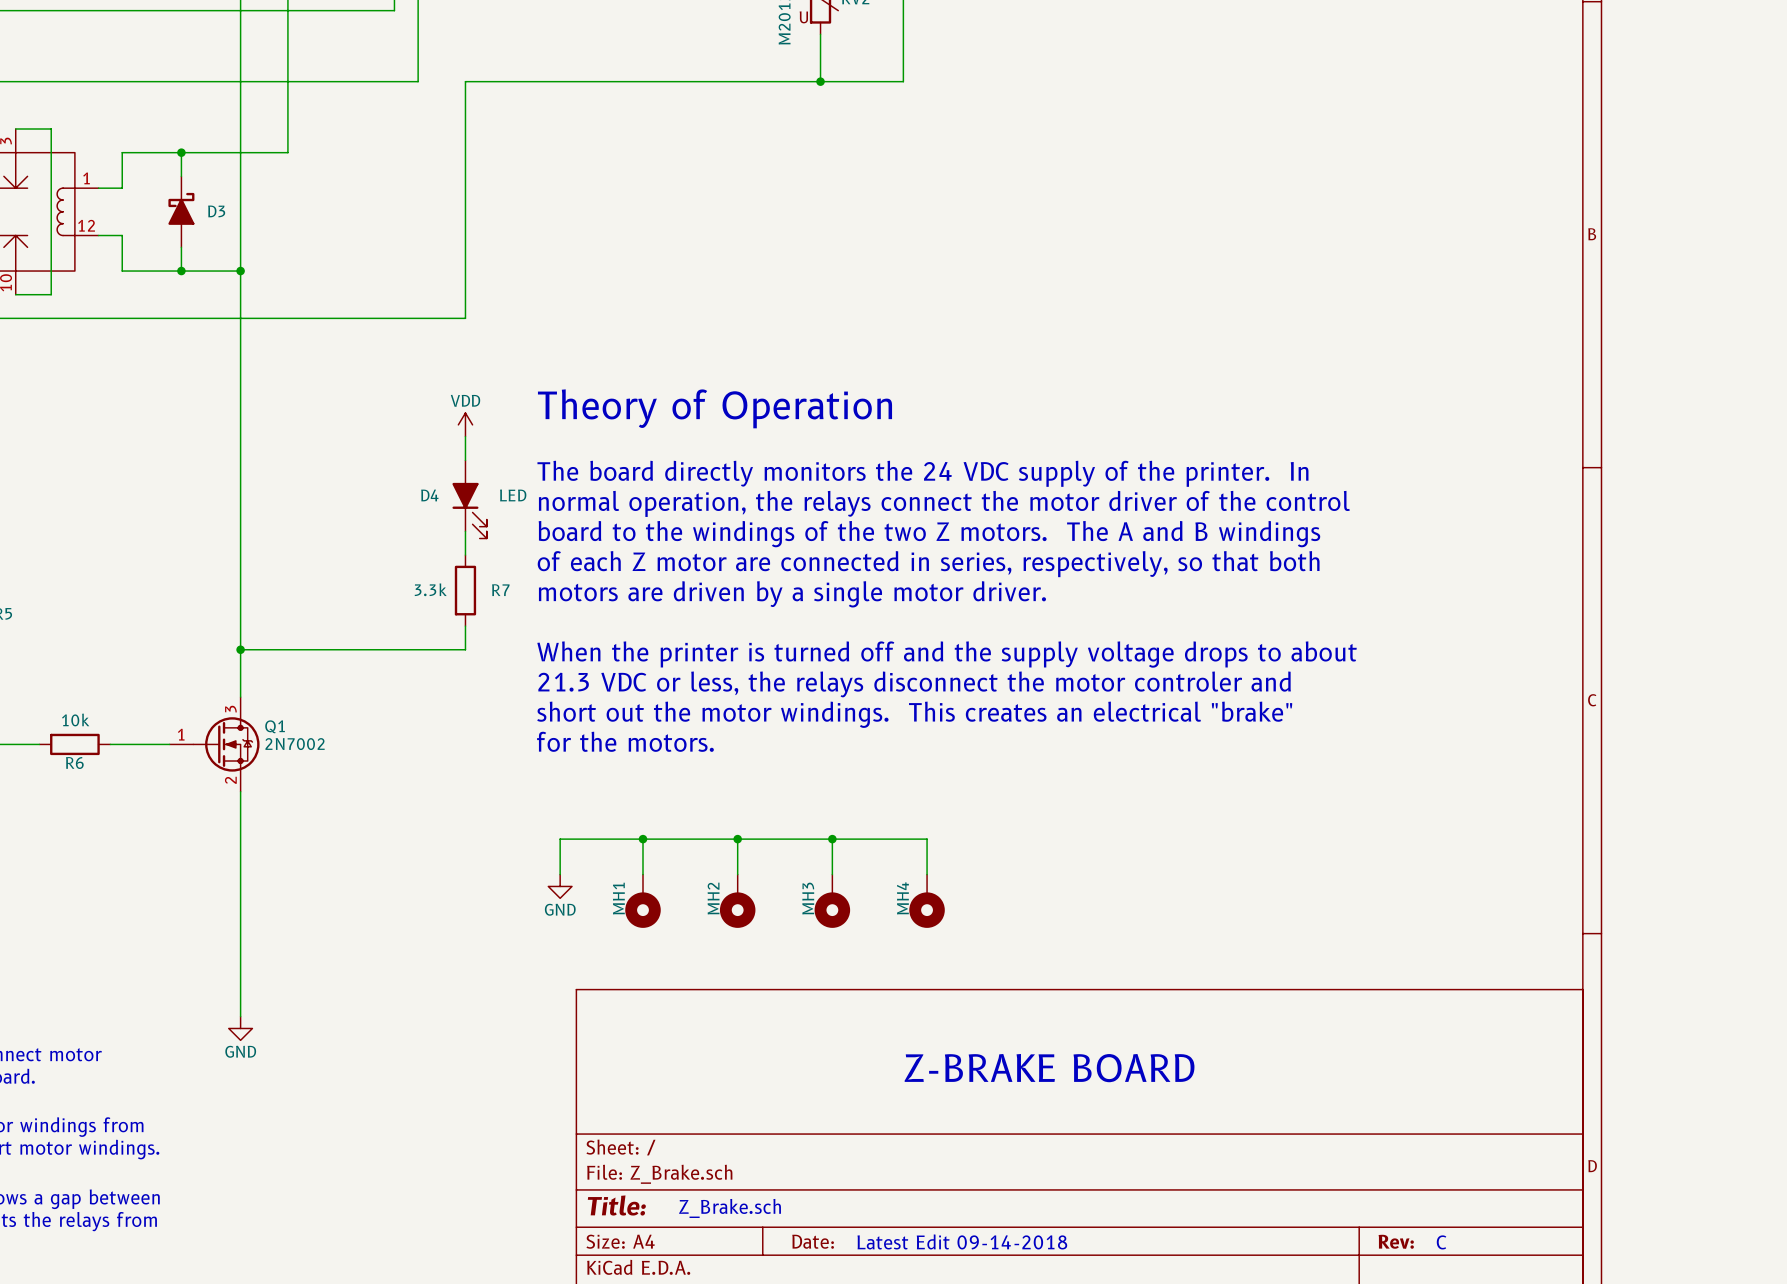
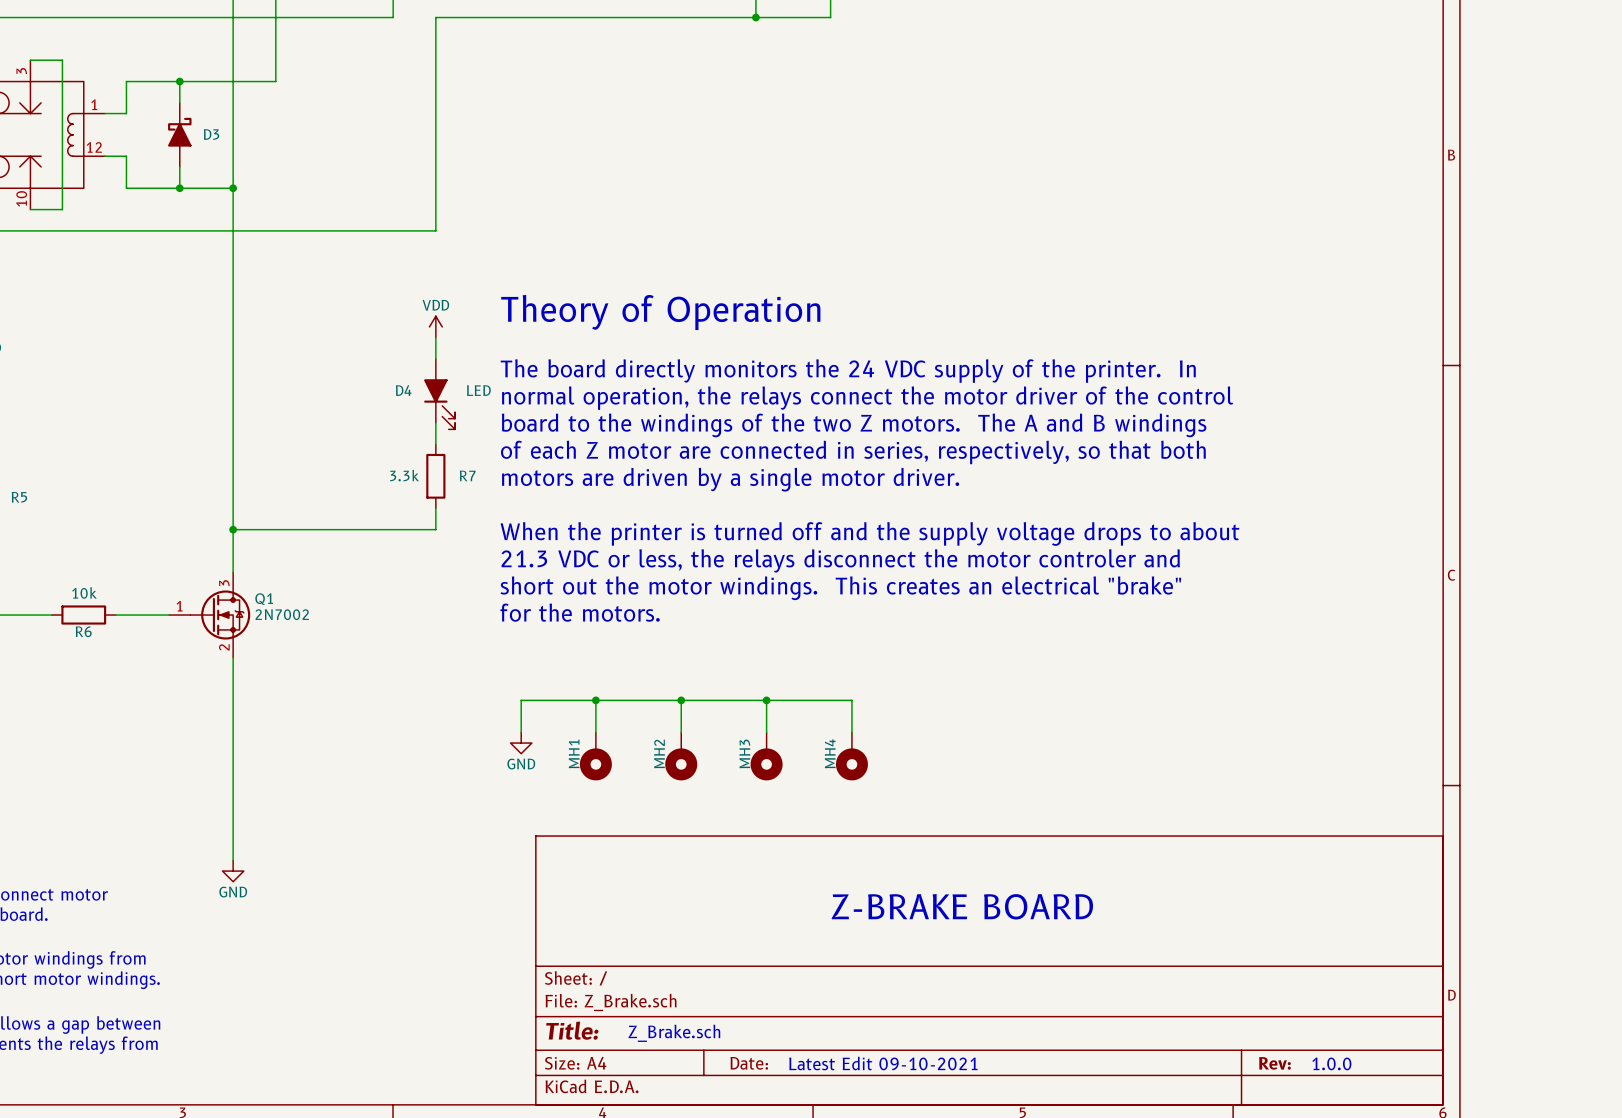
text: Latest Edit 09-14-2018 (962, 1241) -> Latest Edit 09-10-2021 (883, 1063)
text: C (1441, 1242) -> 1.0.0 (1331, 1063)

